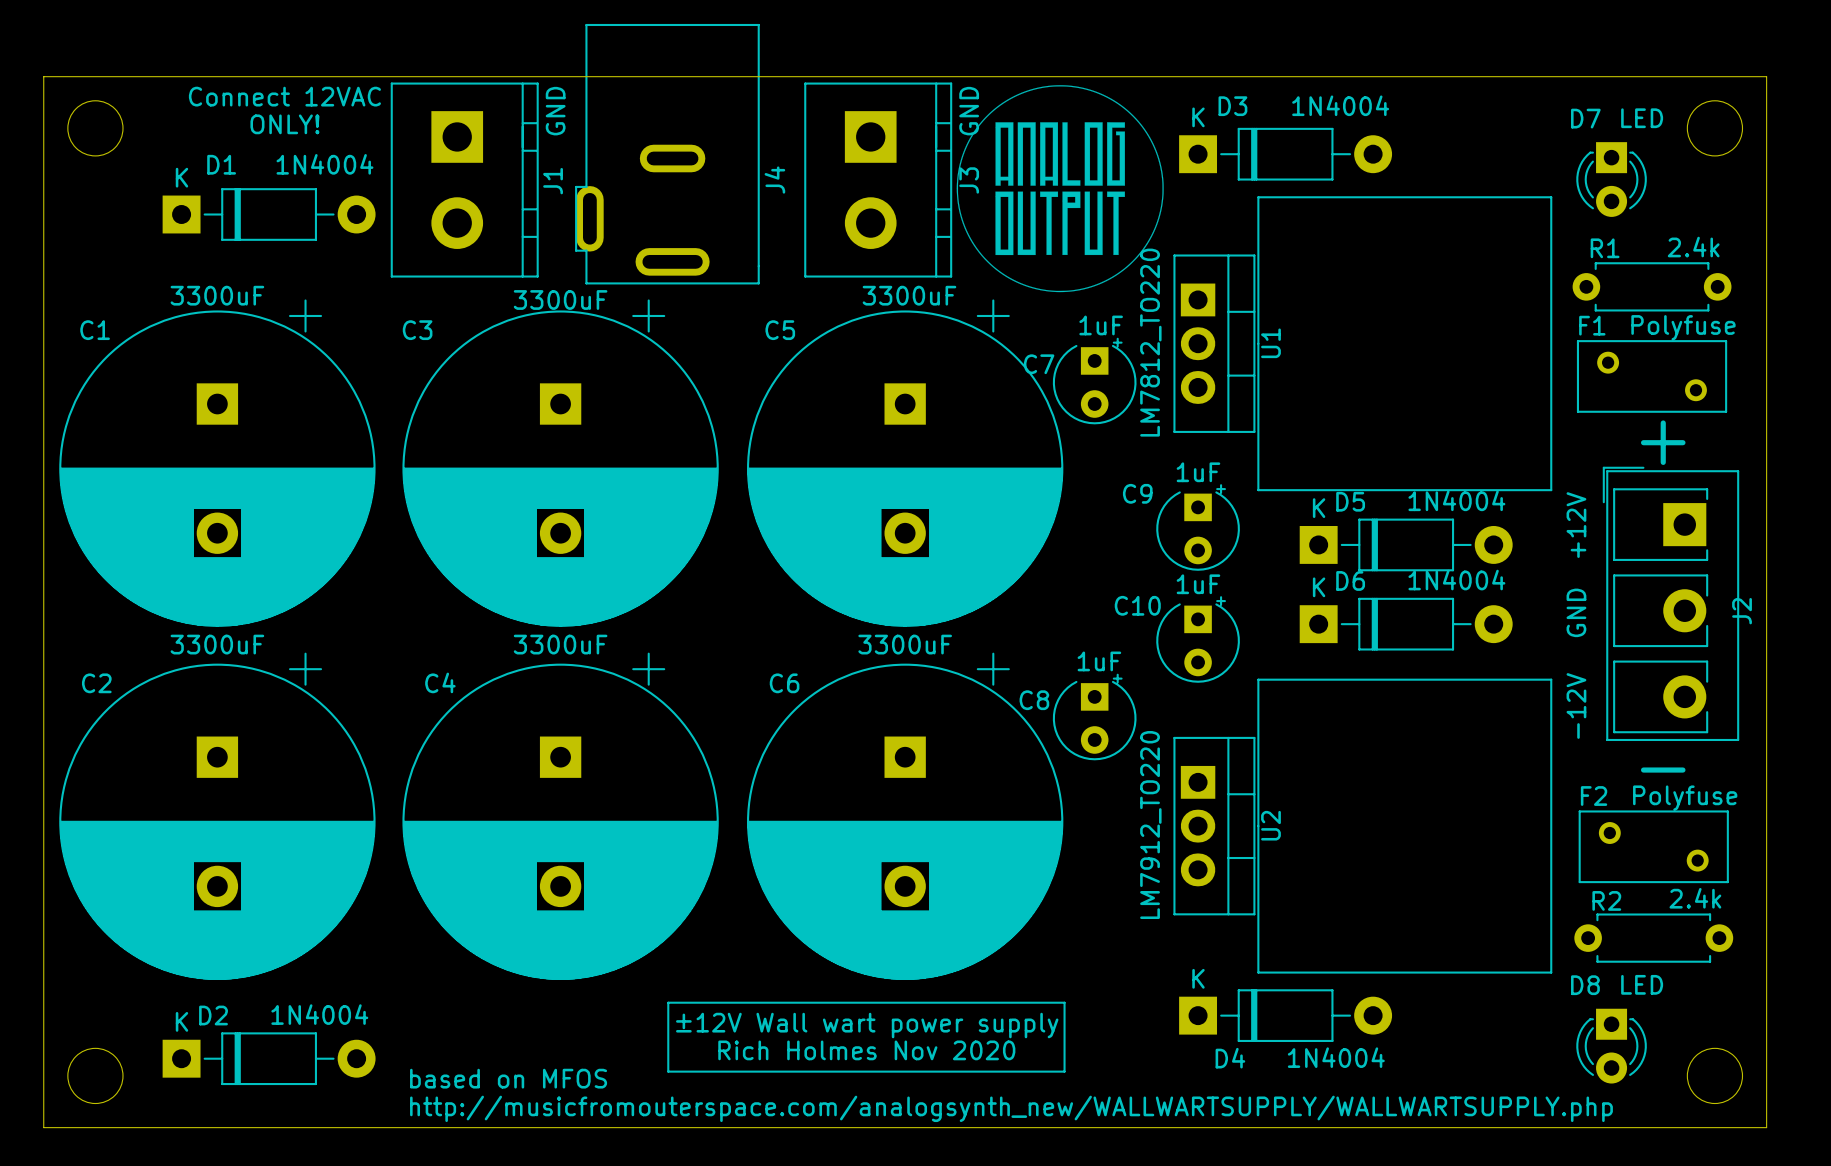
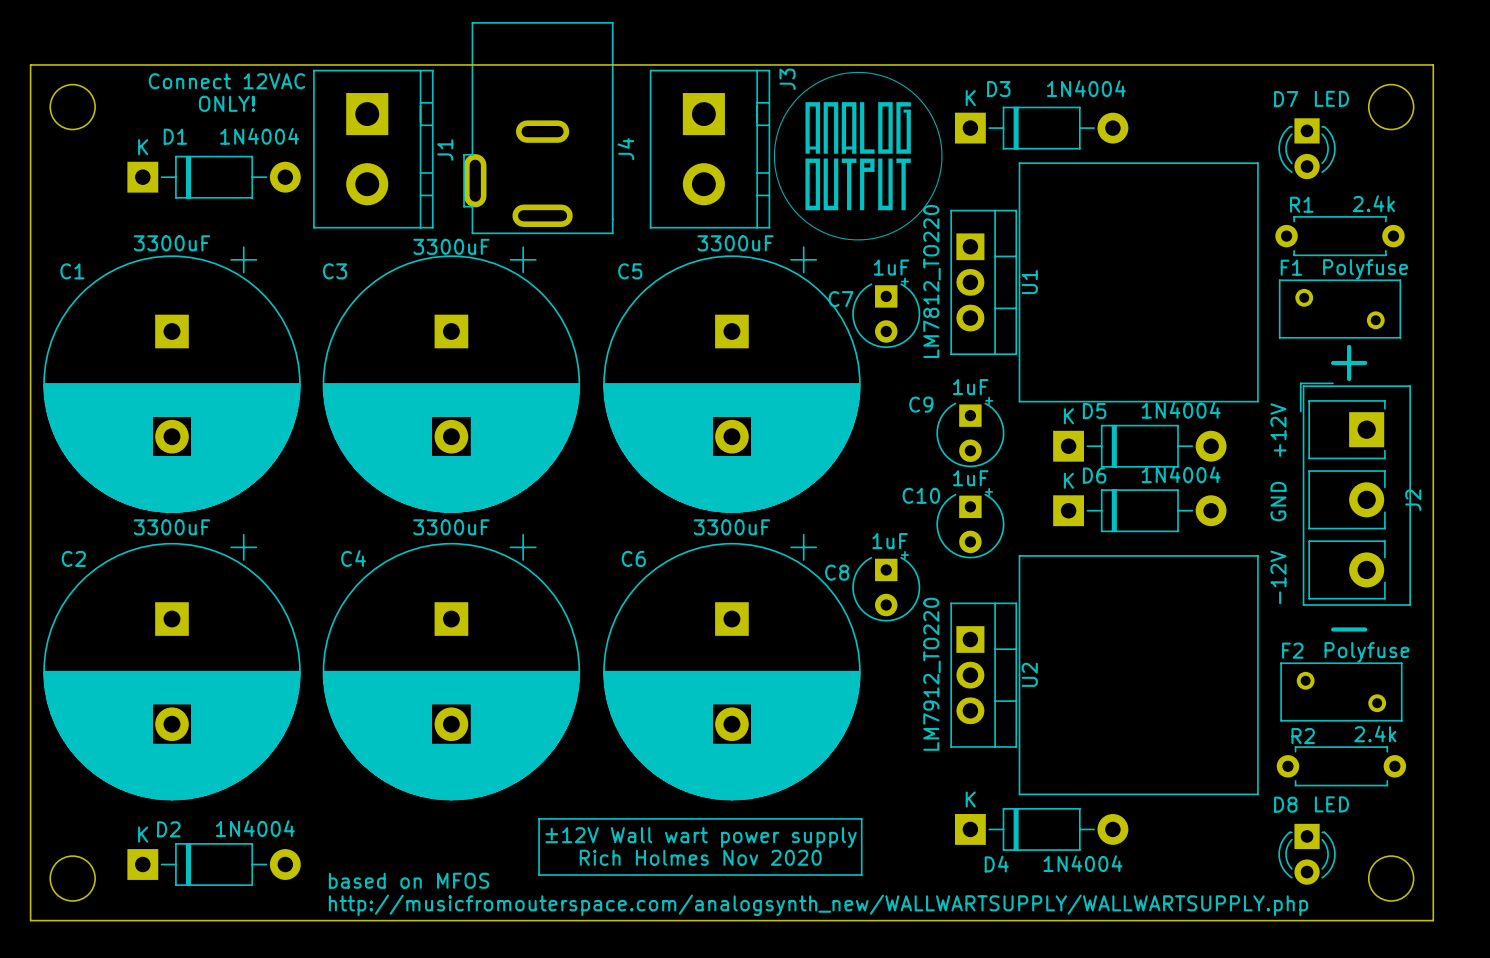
text: GND (555, 111) -> none
text: GND (969, 111) -> none
J3 name position: J3 (969, 180) -> J3 (787, 79)

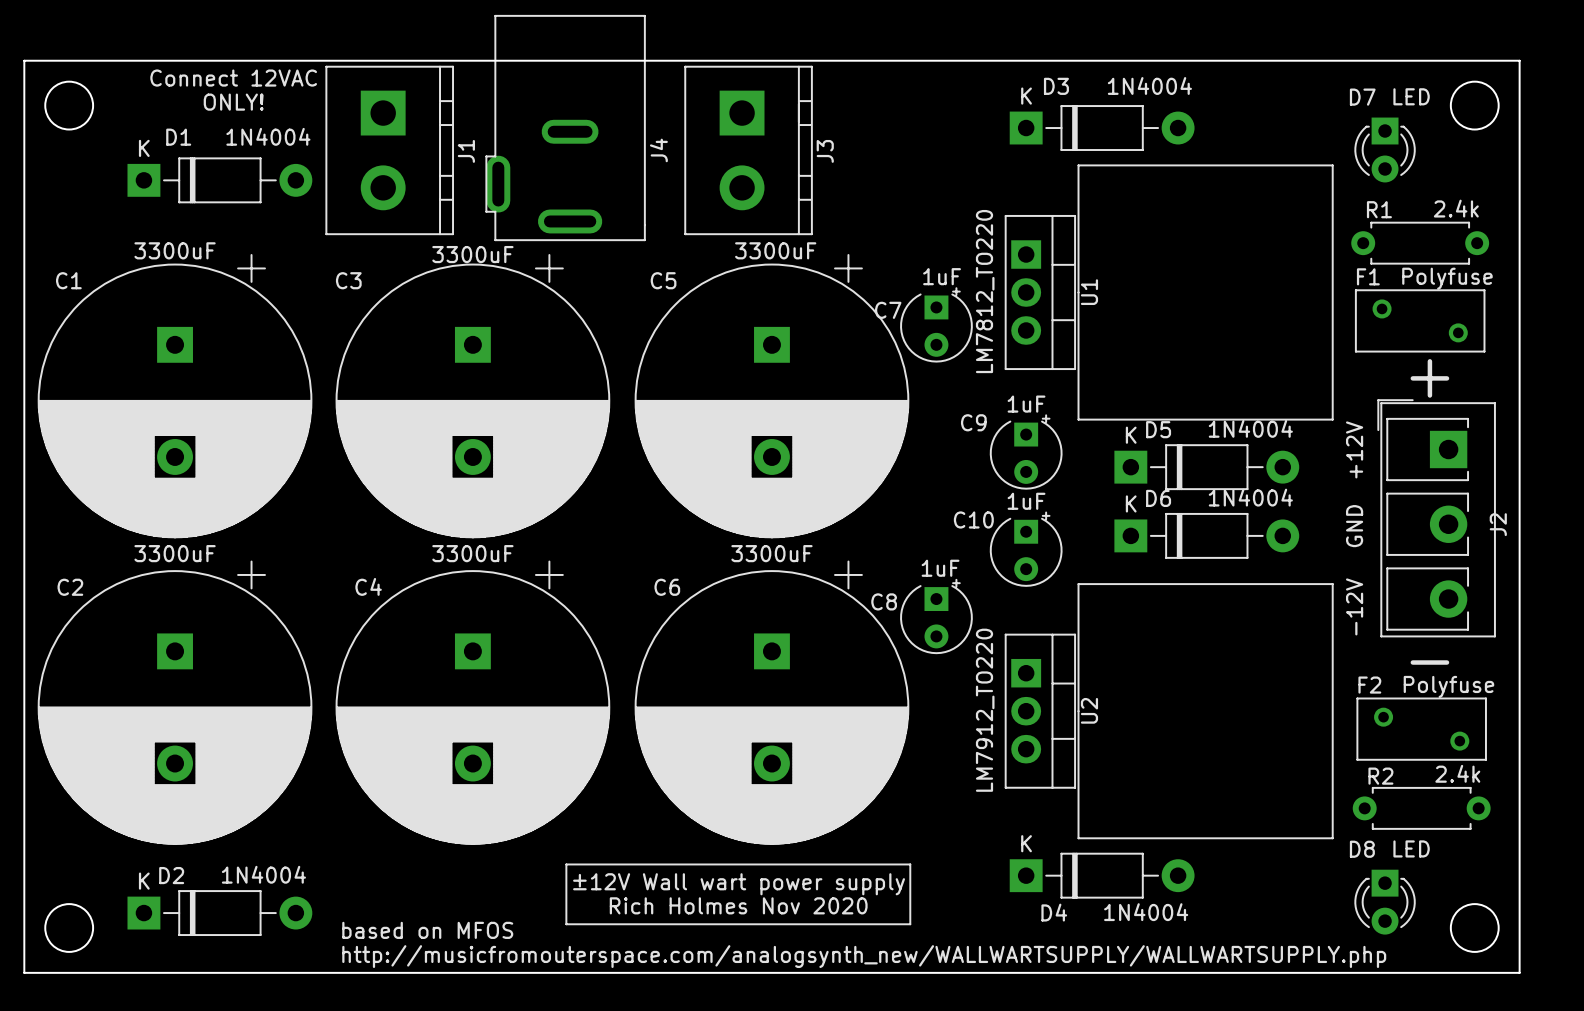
drawing: [773, 71, 943, 241] -> none
J3 name position: J3 (787, 79) -> J3 (825, 151)

